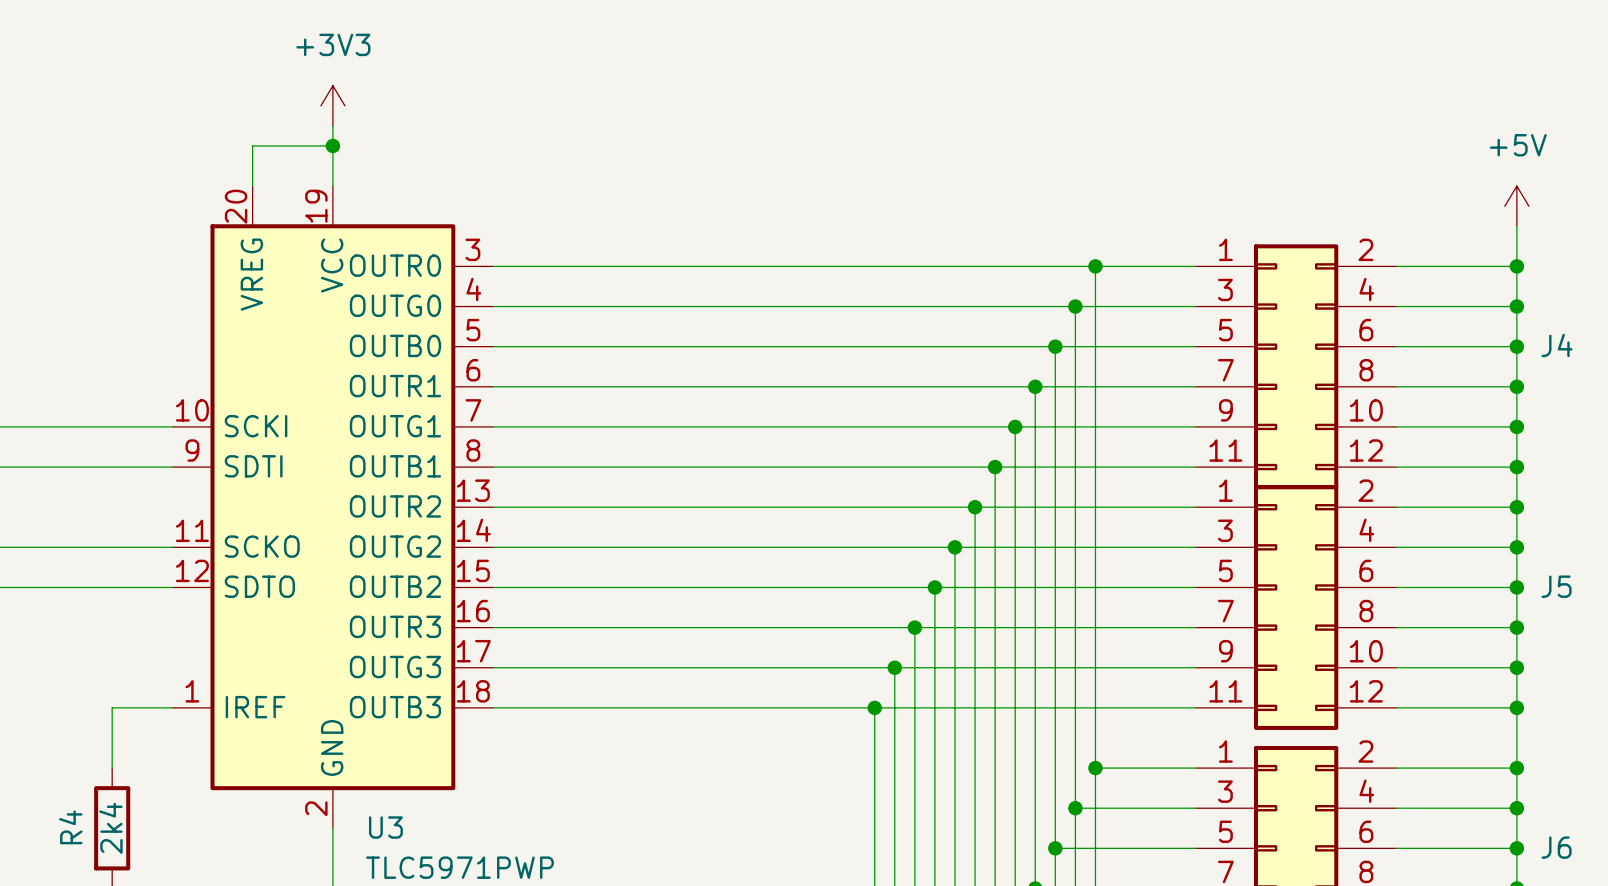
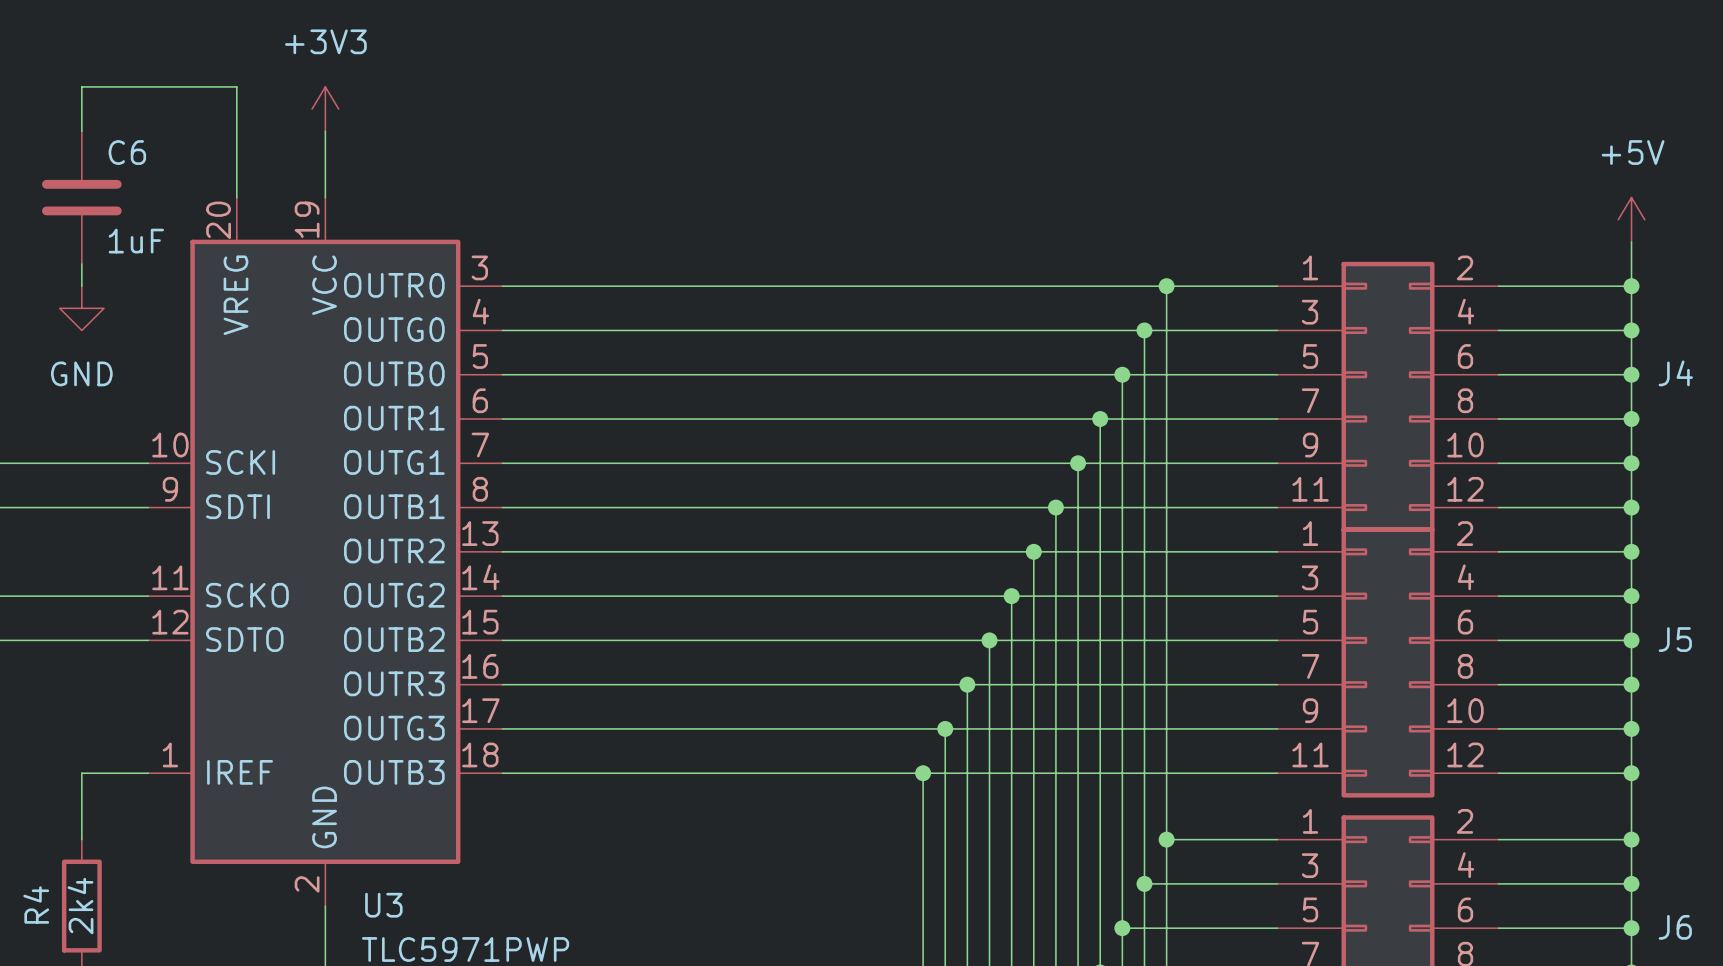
wire: (252, 146) (332, 146) -> (236, 153) (236, 86) (81, 86) (81, 131)
junction: (332, 146) -> none
C6: none -> 1uF (81, 197)
wire: none -> (81, 264) (81, 286)
power symbol: none -> GND (81, 308)

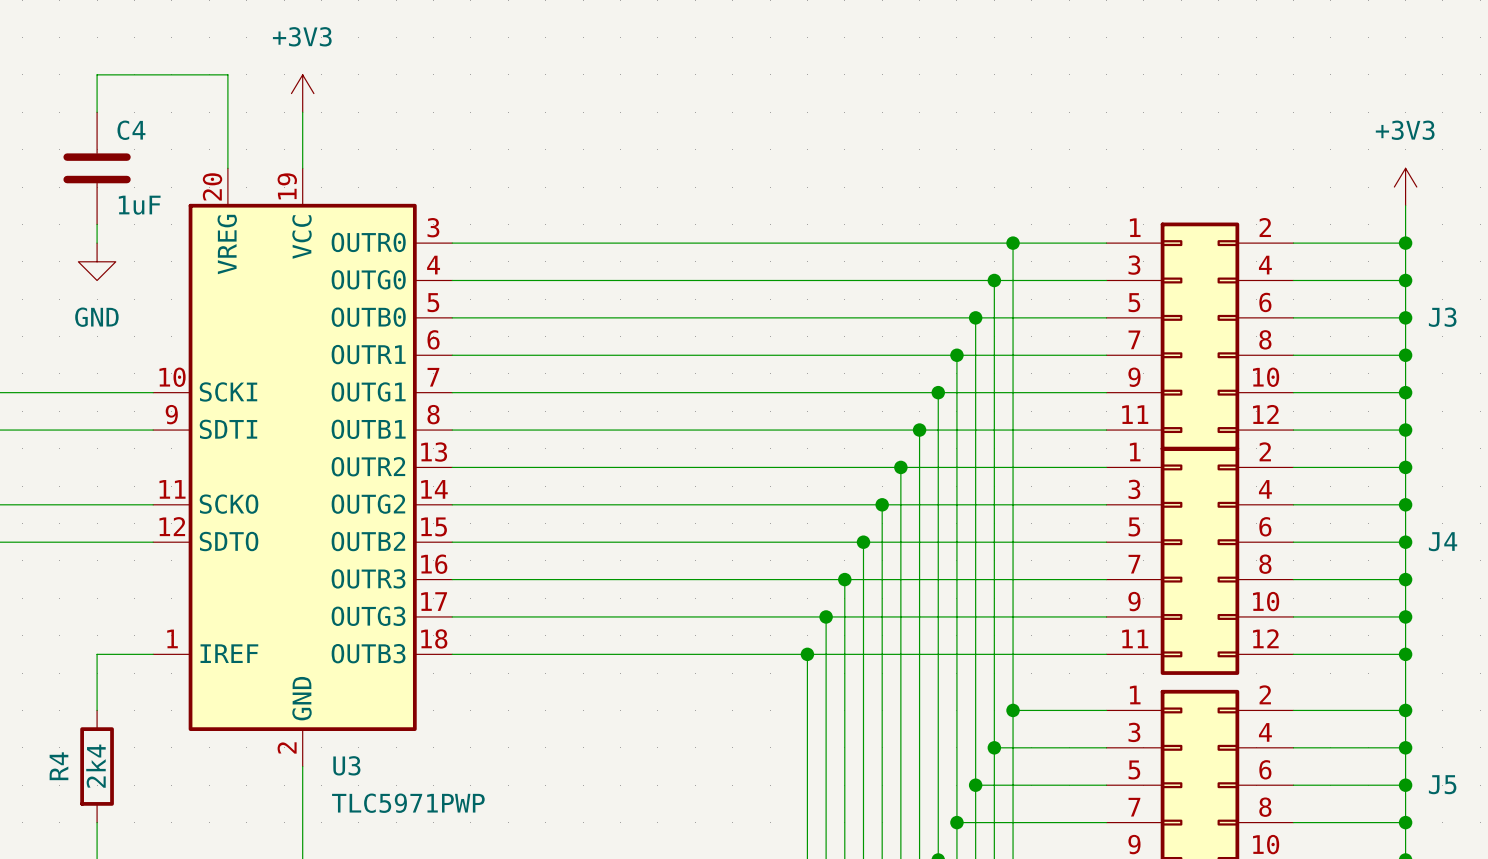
C6 name: C6 (127, 152) -> C4 (131, 130)
power symbol: +5V (1631, 219) -> +3V3 (1405, 187)
J4 name: J4 (1675, 373) -> J3 (1442, 317)
J5 name: J5 (1675, 639) -> J4 (1443, 541)
J6 name: J6 (1675, 927) -> J5 (1442, 784)

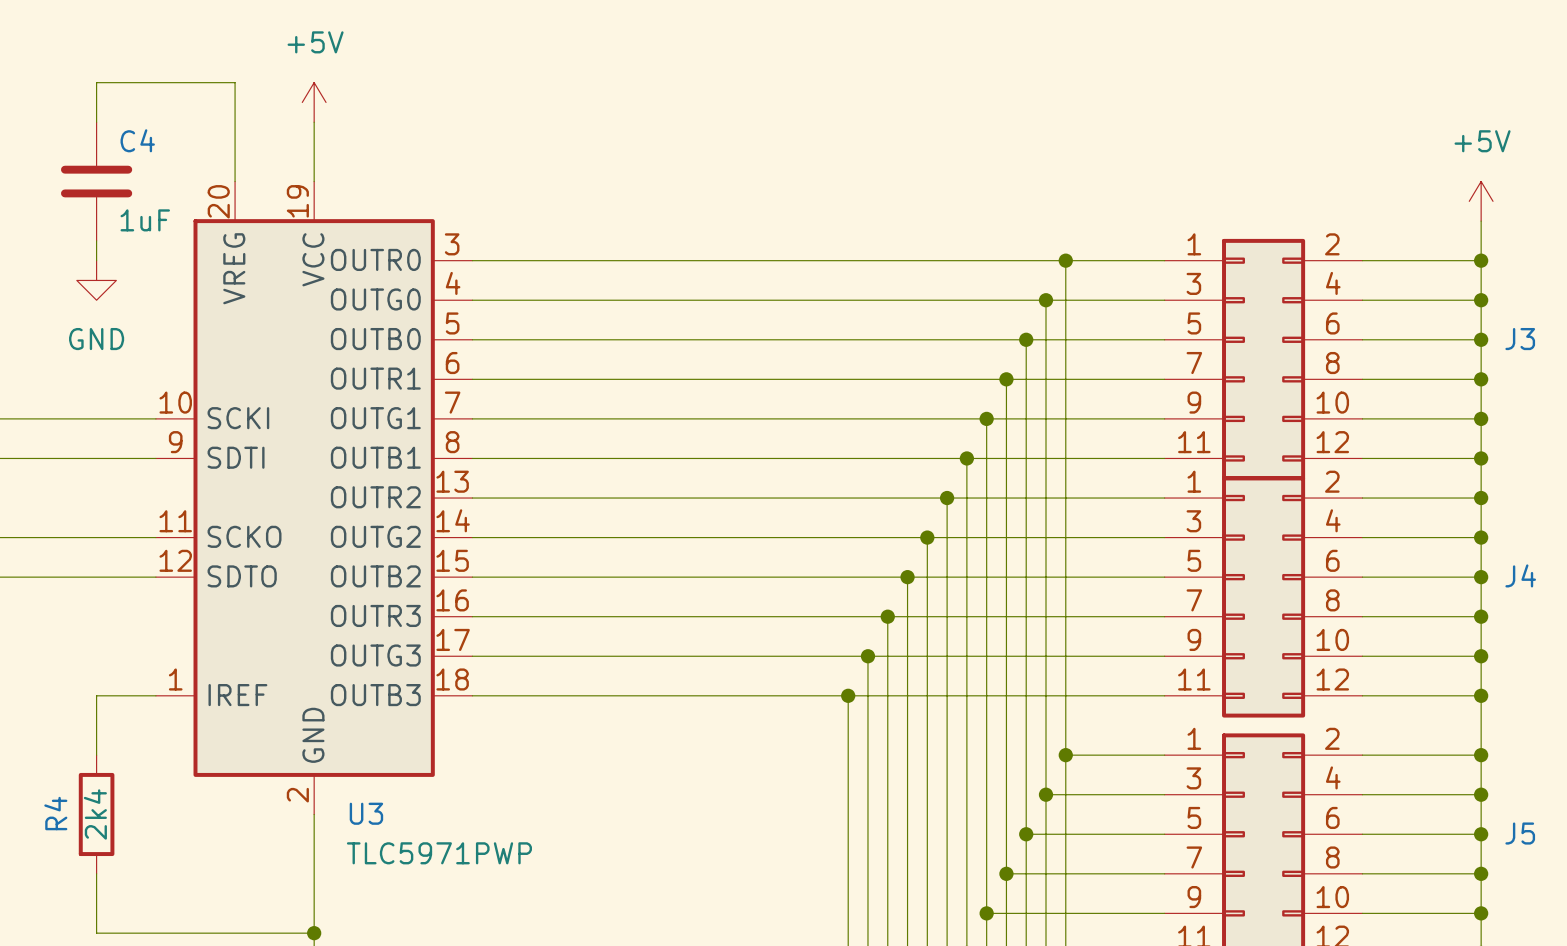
power symbol: +3V3 (302, 93) -> +5V (314, 102)
power symbol: +3V3 (1405, 187) -> +5V (1481, 201)

